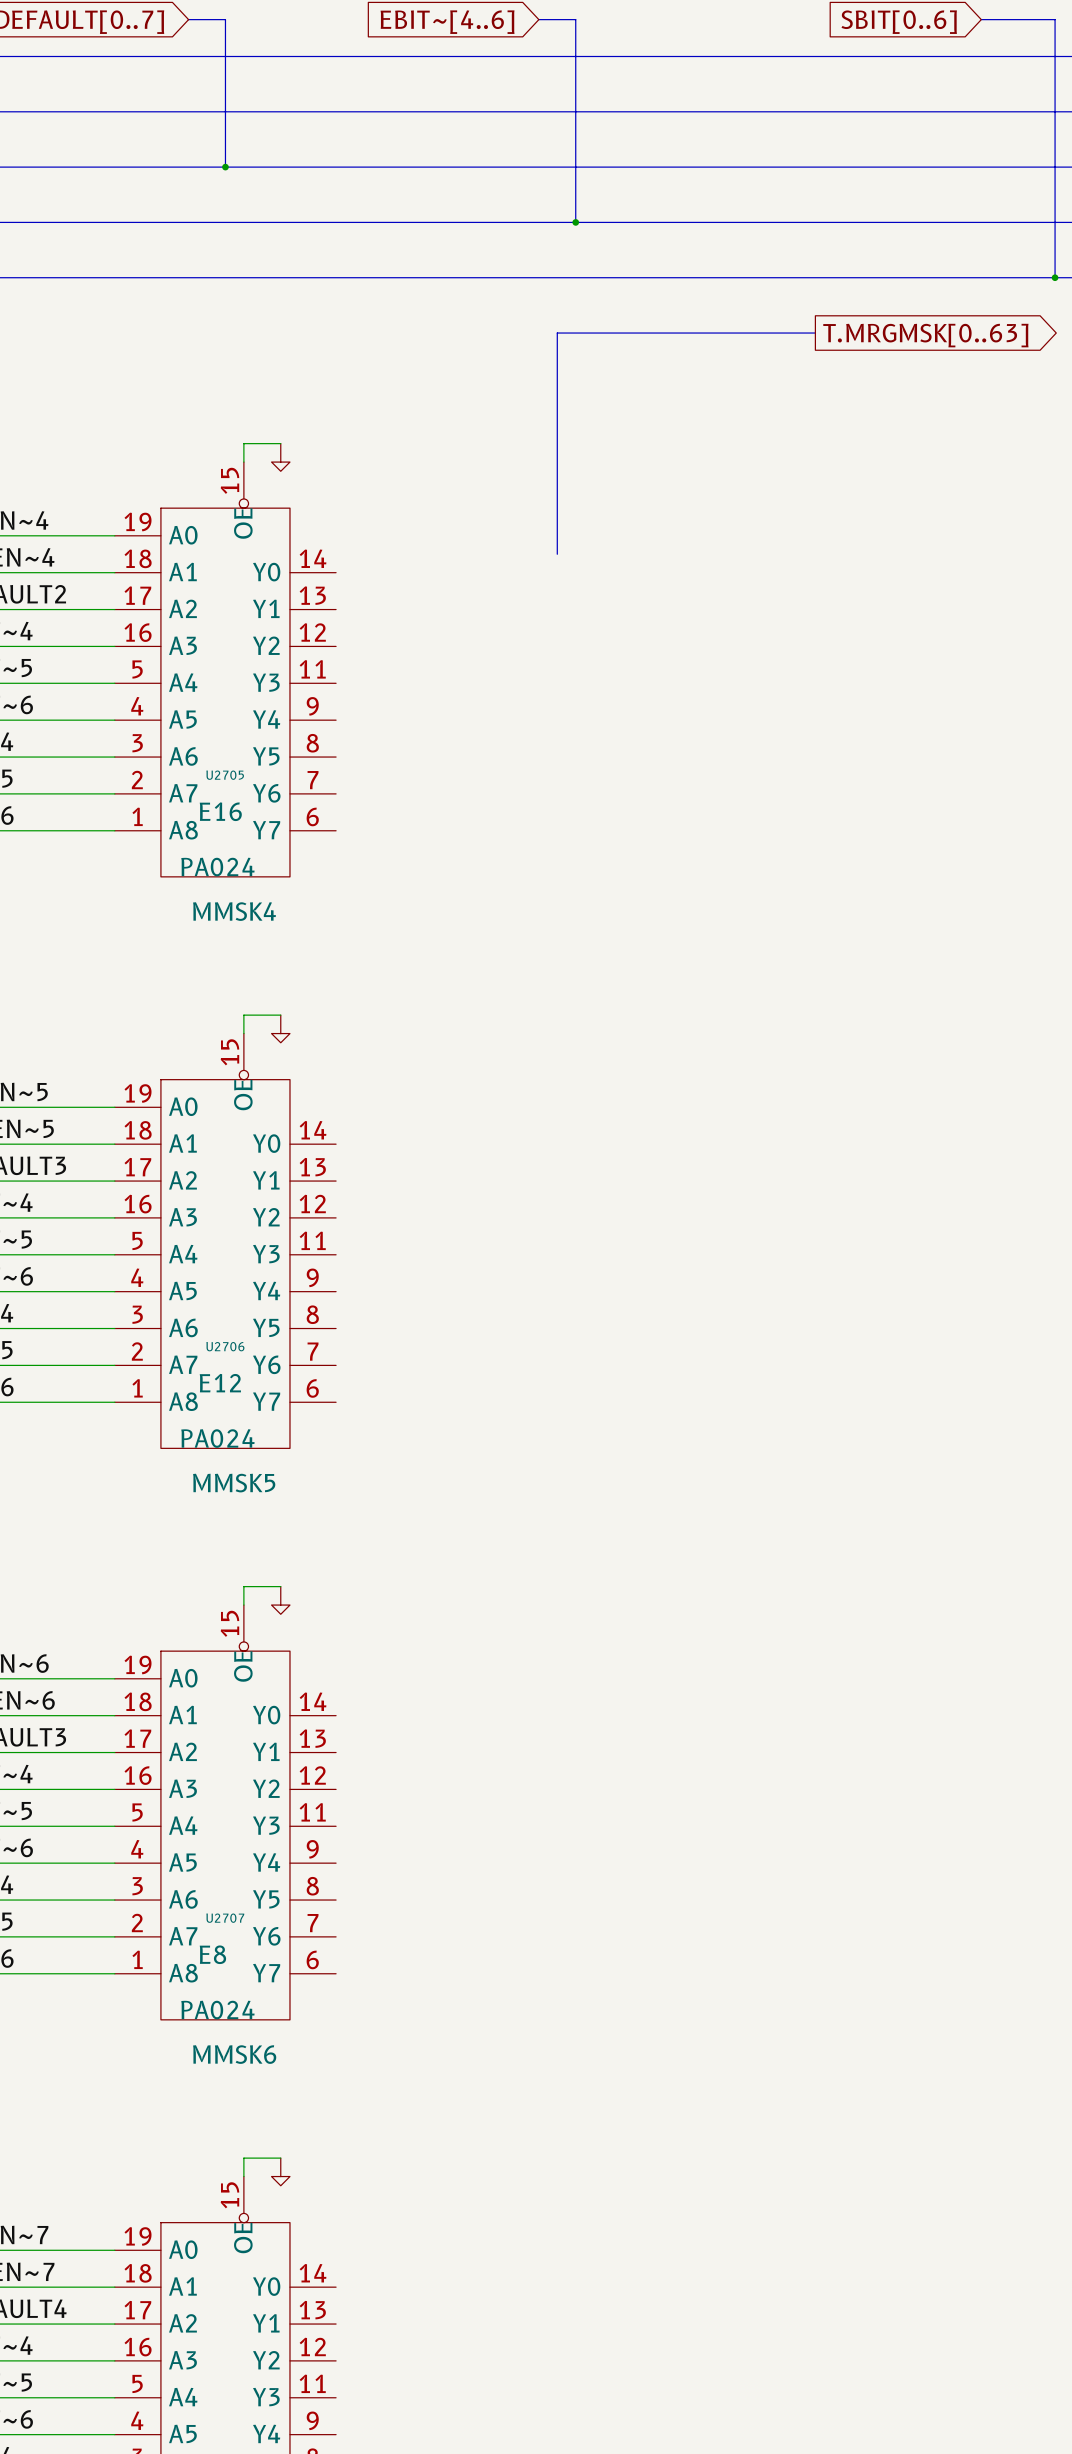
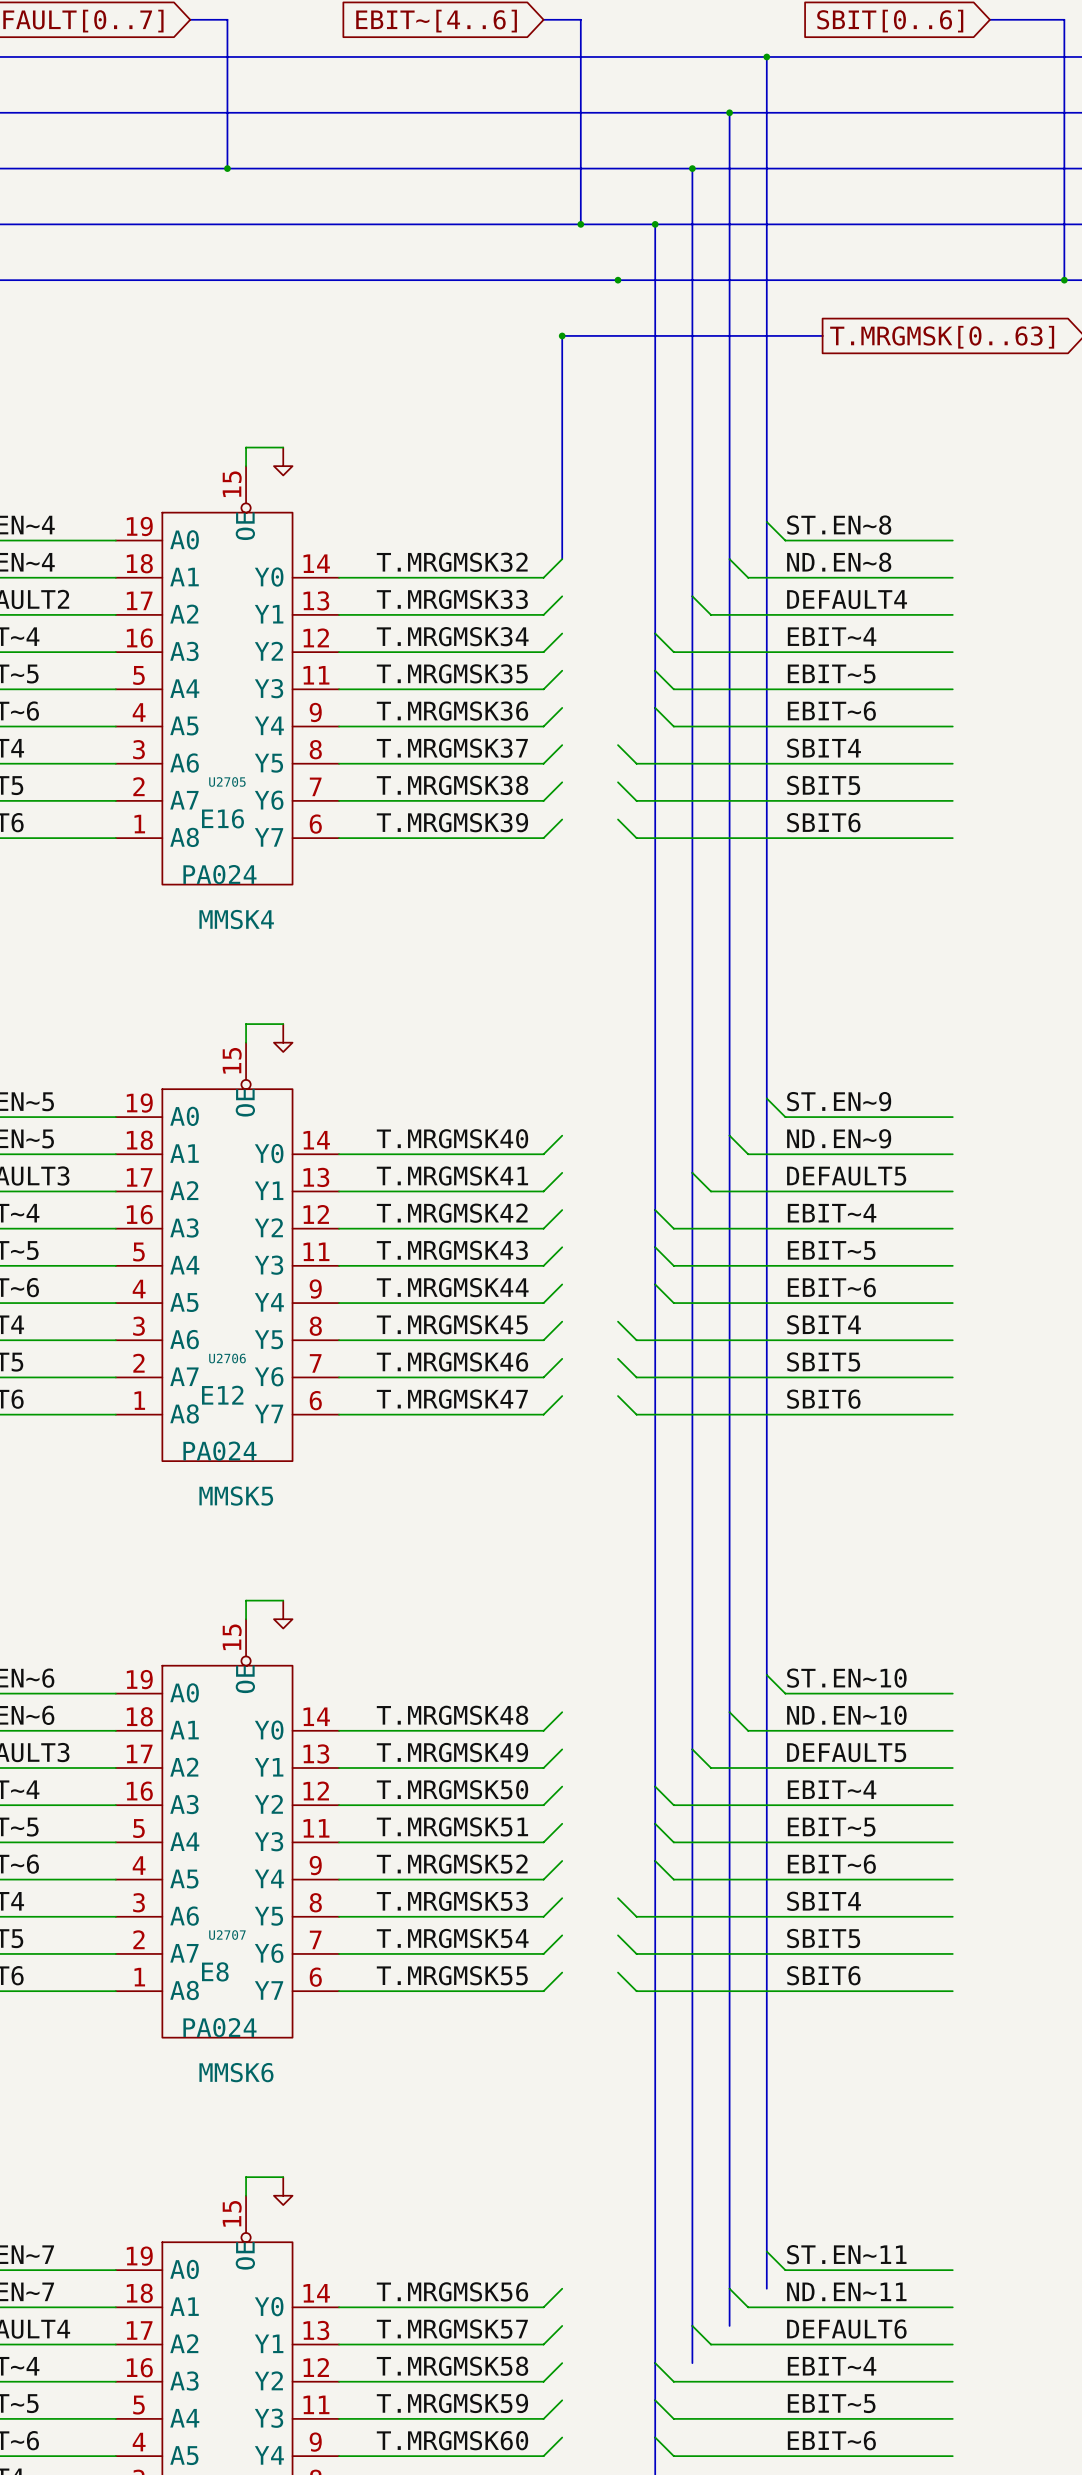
bus: none -> (766, 56) (766, 2288)
junction: none -> (766, 56)
bus: none -> (729, 112) (729, 2325)
junction: none -> (729, 112)
bus: none -> (692, 168) (692, 2363)
junction: none -> (692, 168)
bus: none -> (655, 224) (655, 2474)
junction: none -> (655, 224)
junction: none -> (618, 280)
junction: none -> (562, 335)
wire: none -> (766, 521) (785, 540) (952, 540)
label: none -> ST.EN~8 (839, 525)
wire: none -> (562, 559) (543, 577) (339, 577)
wire: none -> (729, 559) (748, 577) (952, 577)
label: none -> T.MRGMSK32 (452, 562)
label: none -> ND.EN~8 (839, 562)
wire: none -> (562, 596) (543, 614) (339, 614)
wire: none -> (692, 596) (710, 614) (952, 614)
label: none -> T.MRGMSK33 (452, 599)
label: none -> DEFAULT4 (847, 599)
wire: none -> (562, 633) (543, 652) (339, 652)
wire: none -> (655, 633) (673, 652) (952, 652)
label: none -> T.MRGMSK34 (452, 636)
label: none -> EBIT~4 (832, 636)
wire: none -> (562, 670) (543, 689) (339, 689)
wire: none -> (655, 670) (673, 689) (952, 689)
label: none -> EBIT~5 (831, 674)
label: none -> T.MRGMSK35 (452, 673)
wire: none -> (562, 707) (543, 726) (339, 726)
wire: none -> (655, 707) (673, 726) (952, 726)
label: none -> T.MRGMSK36 (452, 711)
label: none -> EBIT~6 (831, 711)
wire: none -> (562, 745) (543, 763) (339, 763)
wire: none -> (618, 745) (636, 763) (952, 763)
label: none -> T.MRGMSK37 (452, 748)
label: none -> SBIT4 (824, 748)
wire: none -> (562, 782) (543, 800) (339, 800)
wire: none -> (618, 782) (636, 800) (952, 800)
label: none -> T.MRGMSK38 (452, 785)
label: none -> SBIT5 (823, 785)
wire: none -> (562, 819) (543, 838) (339, 838)
wire: none -> (618, 819) (636, 838) (952, 838)
label: none -> T.MRGMSK39 (452, 822)
label: none -> SBIT6 (823, 822)
wire: none -> (766, 1098) (785, 1117) (952, 1117)
label: none -> ST.EN~9 (839, 1101)
wire: none -> (562, 1135) (543, 1154) (339, 1154)
wire: none -> (729, 1135) (748, 1154) (952, 1154)
label: none -> T.MRGMSK40 (452, 1138)
label: none -> ND.EN~9 (839, 1138)
wire: none -> (562, 1172) (543, 1191) (339, 1191)
wire: none -> (692, 1172) (710, 1191) (952, 1191)
label: none -> T.MRGMSK41 (452, 1175)
label: none -> DEFAULT5 (846, 1176)
wire: none -> (562, 1210) (543, 1228) (339, 1228)
wire: none -> (655, 1210) (673, 1228) (952, 1228)
label: none -> T.MRGMSK42 (452, 1213)
label: none -> EBIT~4 (832, 1213)
wire: none -> (562, 1247) (543, 1265) (339, 1265)
wire: none -> (655, 1247) (673, 1265) (952, 1265)
label: none -> T.MRGMSK43 (452, 1250)
label: none -> EBIT~5 (831, 1250)
wire: none -> (562, 1284) (543, 1303) (339, 1303)
wire: none -> (655, 1284) (673, 1303) (952, 1303)
label: none -> T.MRGMSK44 (452, 1287)
label: none -> EBIT~6 (831, 1287)
wire: none -> (562, 1321) (543, 1340) (339, 1340)
wire: none -> (618, 1321) (636, 1340) (952, 1340)
label: none -> T.MRGMSK45 (452, 1324)
label: none -> SBIT4 (824, 1324)
wire: none -> (562, 1358) (543, 1377) (339, 1377)
wire: none -> (618, 1358) (636, 1377) (952, 1377)
label: none -> T.MRGMSK46 (452, 1361)
label: none -> SBIT5 (823, 1361)
wire: none -> (562, 1396) (543, 1414) (339, 1414)
wire: none -> (618, 1396) (636, 1414) (952, 1414)
label: none -> T.MRGMSK47 (452, 1399)
label: none -> SBIT6 (823, 1399)
wire: none -> (766, 1675) (785, 1693) (952, 1693)
label: none -> ST.EN~10 (846, 1678)
wire: none -> (562, 1712) (543, 1730) (339, 1730)
wire: none -> (729, 1712) (748, 1730) (952, 1730)
label: none -> T.MRGMSK48 (452, 1715)
label: none -> ND.EN~10 (846, 1715)
wire: none -> (562, 1749) (543, 1767) (339, 1767)
wire: none -> (692, 1749) (710, 1767) (952, 1767)
label: none -> T.MRGMSK49 (452, 1752)
label: none -> DEFAULT5 (846, 1752)
wire: none -> (562, 1786) (543, 1805) (339, 1805)
wire: none -> (655, 1786) (673, 1805) (952, 1805)
label: none -> T.MRGMSK50 (452, 1789)
label: none -> EBIT~4 (832, 1789)
wire: none -> (562, 1823) (543, 1842) (339, 1842)
wire: none -> (655, 1823) (673, 1842) (952, 1842)
label: none -> EBIT~5 (831, 1827)
label: none -> T.MRGMSK51 (452, 1826)
wire: none -> (562, 1860) (543, 1879) (339, 1879)
wire: none -> (655, 1860) (673, 1879) (952, 1879)
label: none -> T.MRGMSK52 (452, 1864)
label: none -> EBIT~6 (831, 1864)
wire: none -> (562, 1898) (543, 1916) (339, 1916)
wire: none -> (618, 1898) (636, 1916) (952, 1916)
label: none -> T.MRGMSK53 (452, 1901)
label: none -> SBIT4 (824, 1901)
wire: none -> (562, 1935) (543, 1953) (339, 1953)
wire: none -> (618, 1935) (636, 1953) (952, 1953)
label: none -> T.MRGMSK54 (452, 1938)
label: none -> SBIT5 (823, 1938)
wire: none -> (562, 1972) (543, 1991) (339, 1991)
wire: none -> (618, 1972) (636, 1991) (952, 1991)
label: none -> T.MRGMSK55 (452, 1975)
label: none -> SBIT6 (823, 1975)
wire: none -> (766, 2251) (785, 2270) (952, 2270)
label: none -> ST.EN~11 (846, 2254)
wire: none -> (562, 2288) (543, 2307) (339, 2307)
wire: none -> (729, 2288) (748, 2307) (952, 2307)
label: none -> T.MRGMSK56 (452, 2291)
label: none -> ND.EN~11 (846, 2291)
wire: none -> (562, 2325) (543, 2344) (339, 2344)
wire: none -> (692, 2325) (710, 2344) (952, 2344)
label: none -> T.MRGMSK57 (452, 2329)
label: none -> DEFAULT6 (846, 2329)
wire: none -> (562, 2363) (543, 2381) (339, 2381)
wire: none -> (655, 2363) (673, 2381) (952, 2381)
label: none -> T.MRGMSK58 (452, 2366)
label: none -> EBIT~4 (832, 2366)
wire: none -> (562, 2400) (543, 2418) (339, 2418)
wire: none -> (655, 2400) (673, 2418) (952, 2418)
label: none -> T.MRGMSK59 (452, 2403)
label: none -> EBIT~5 (831, 2403)
wire: none -> (562, 2437) (543, 2456) (339, 2456)
wire: none -> (655, 2437) (673, 2456) (952, 2456)
label: none -> T.MRGMSK60 (452, 2440)
label: none -> EBIT~6 (831, 2440)

